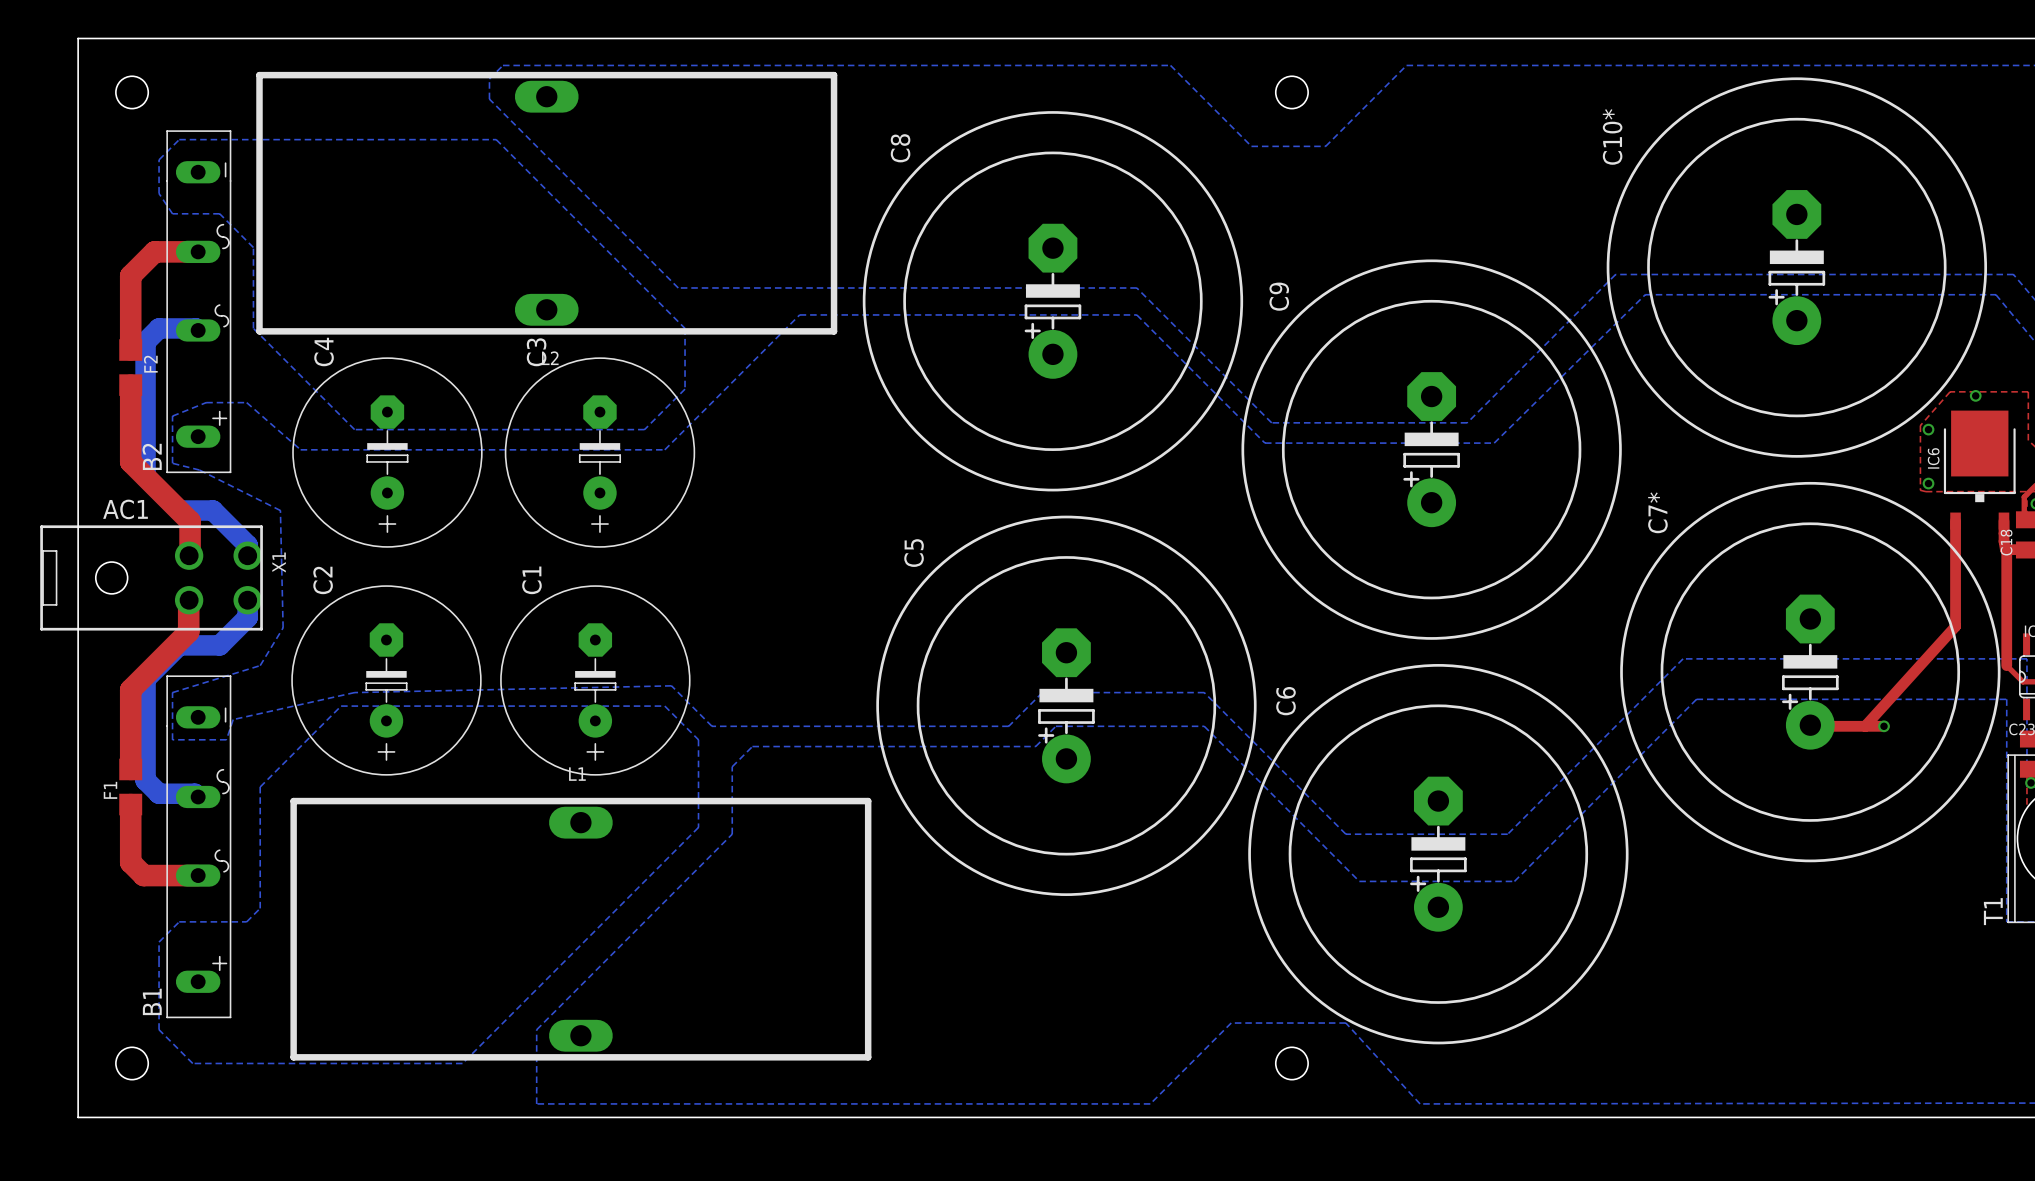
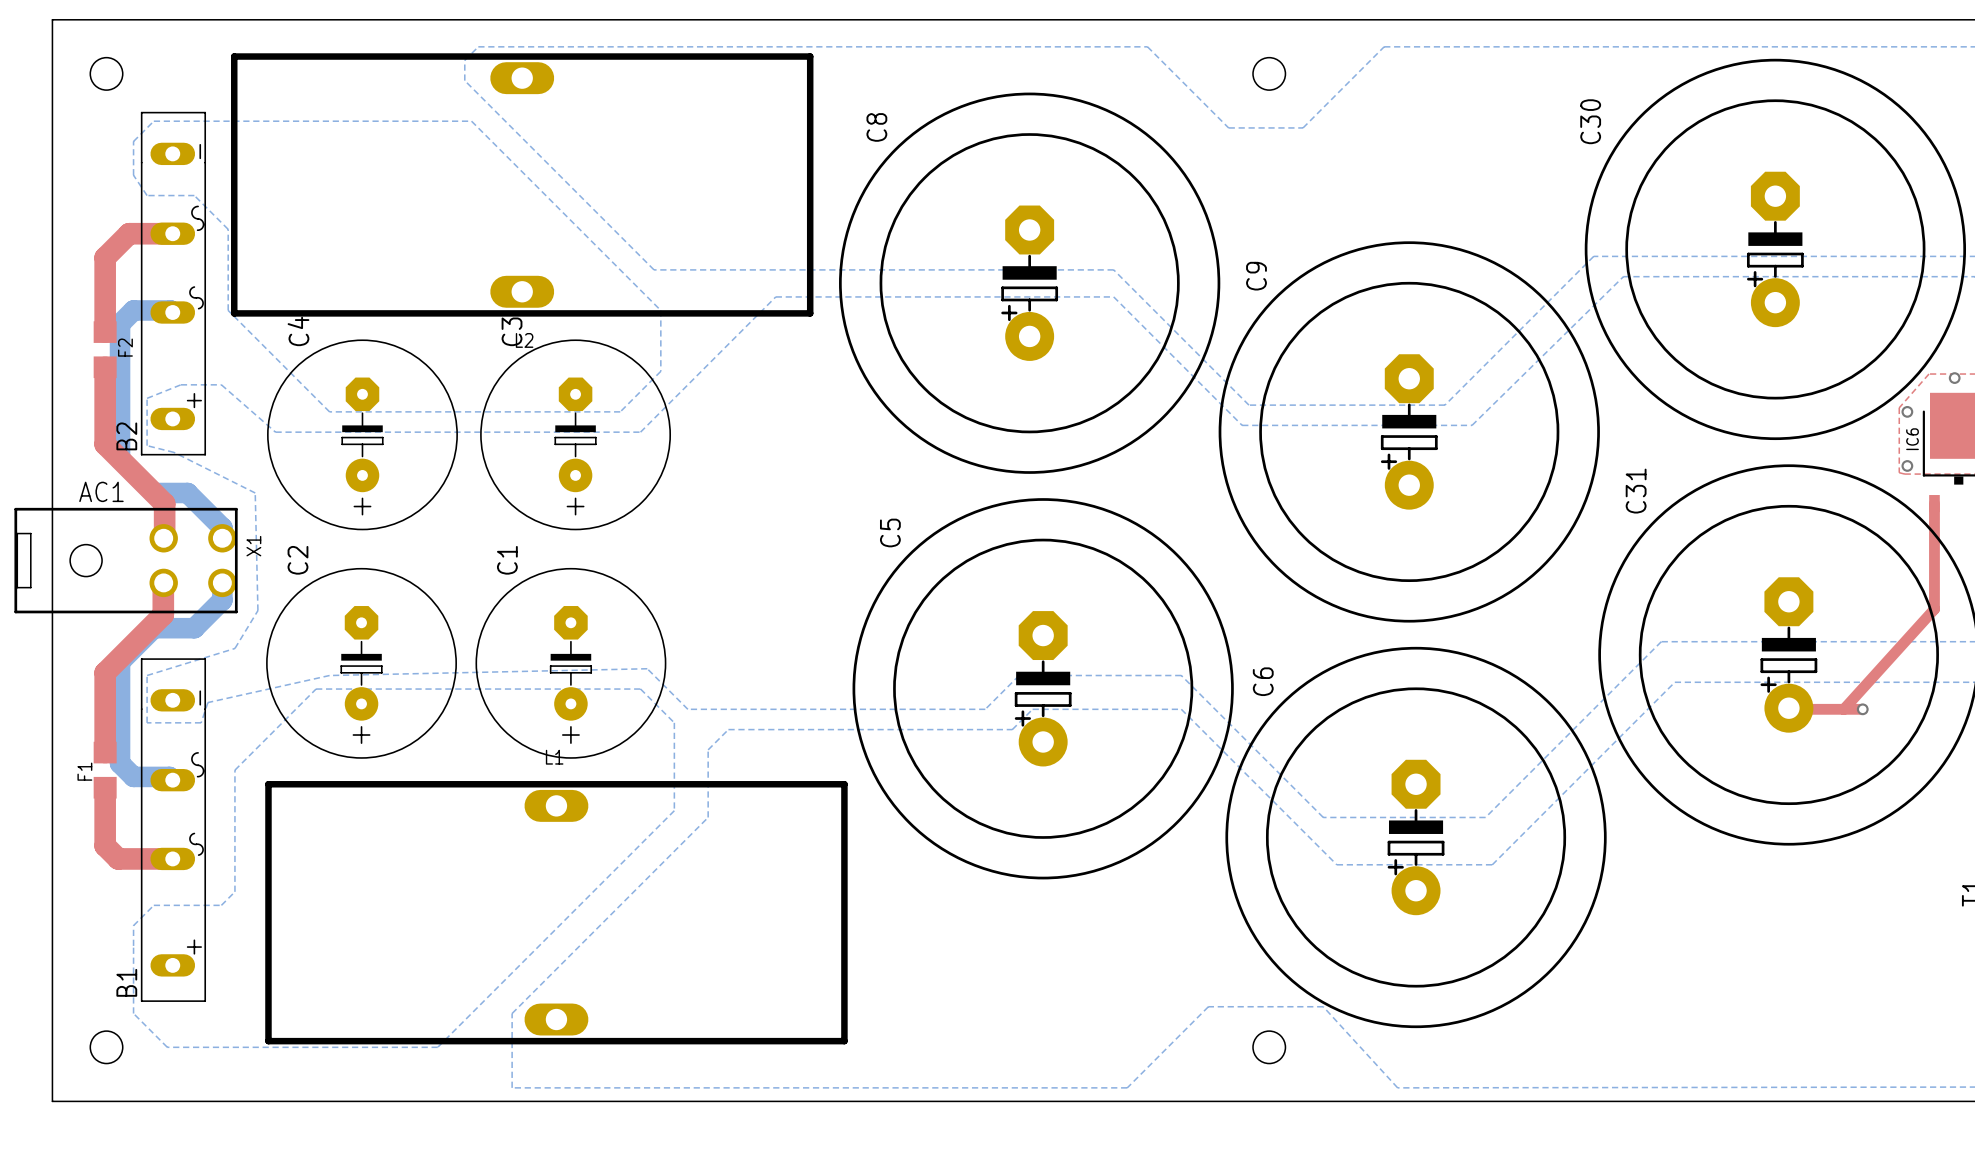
C10* name: C10* (1612, 136) -> C30 (1590, 121)
C7* name: C7* (1657, 512) -> C31 (1636, 491)

